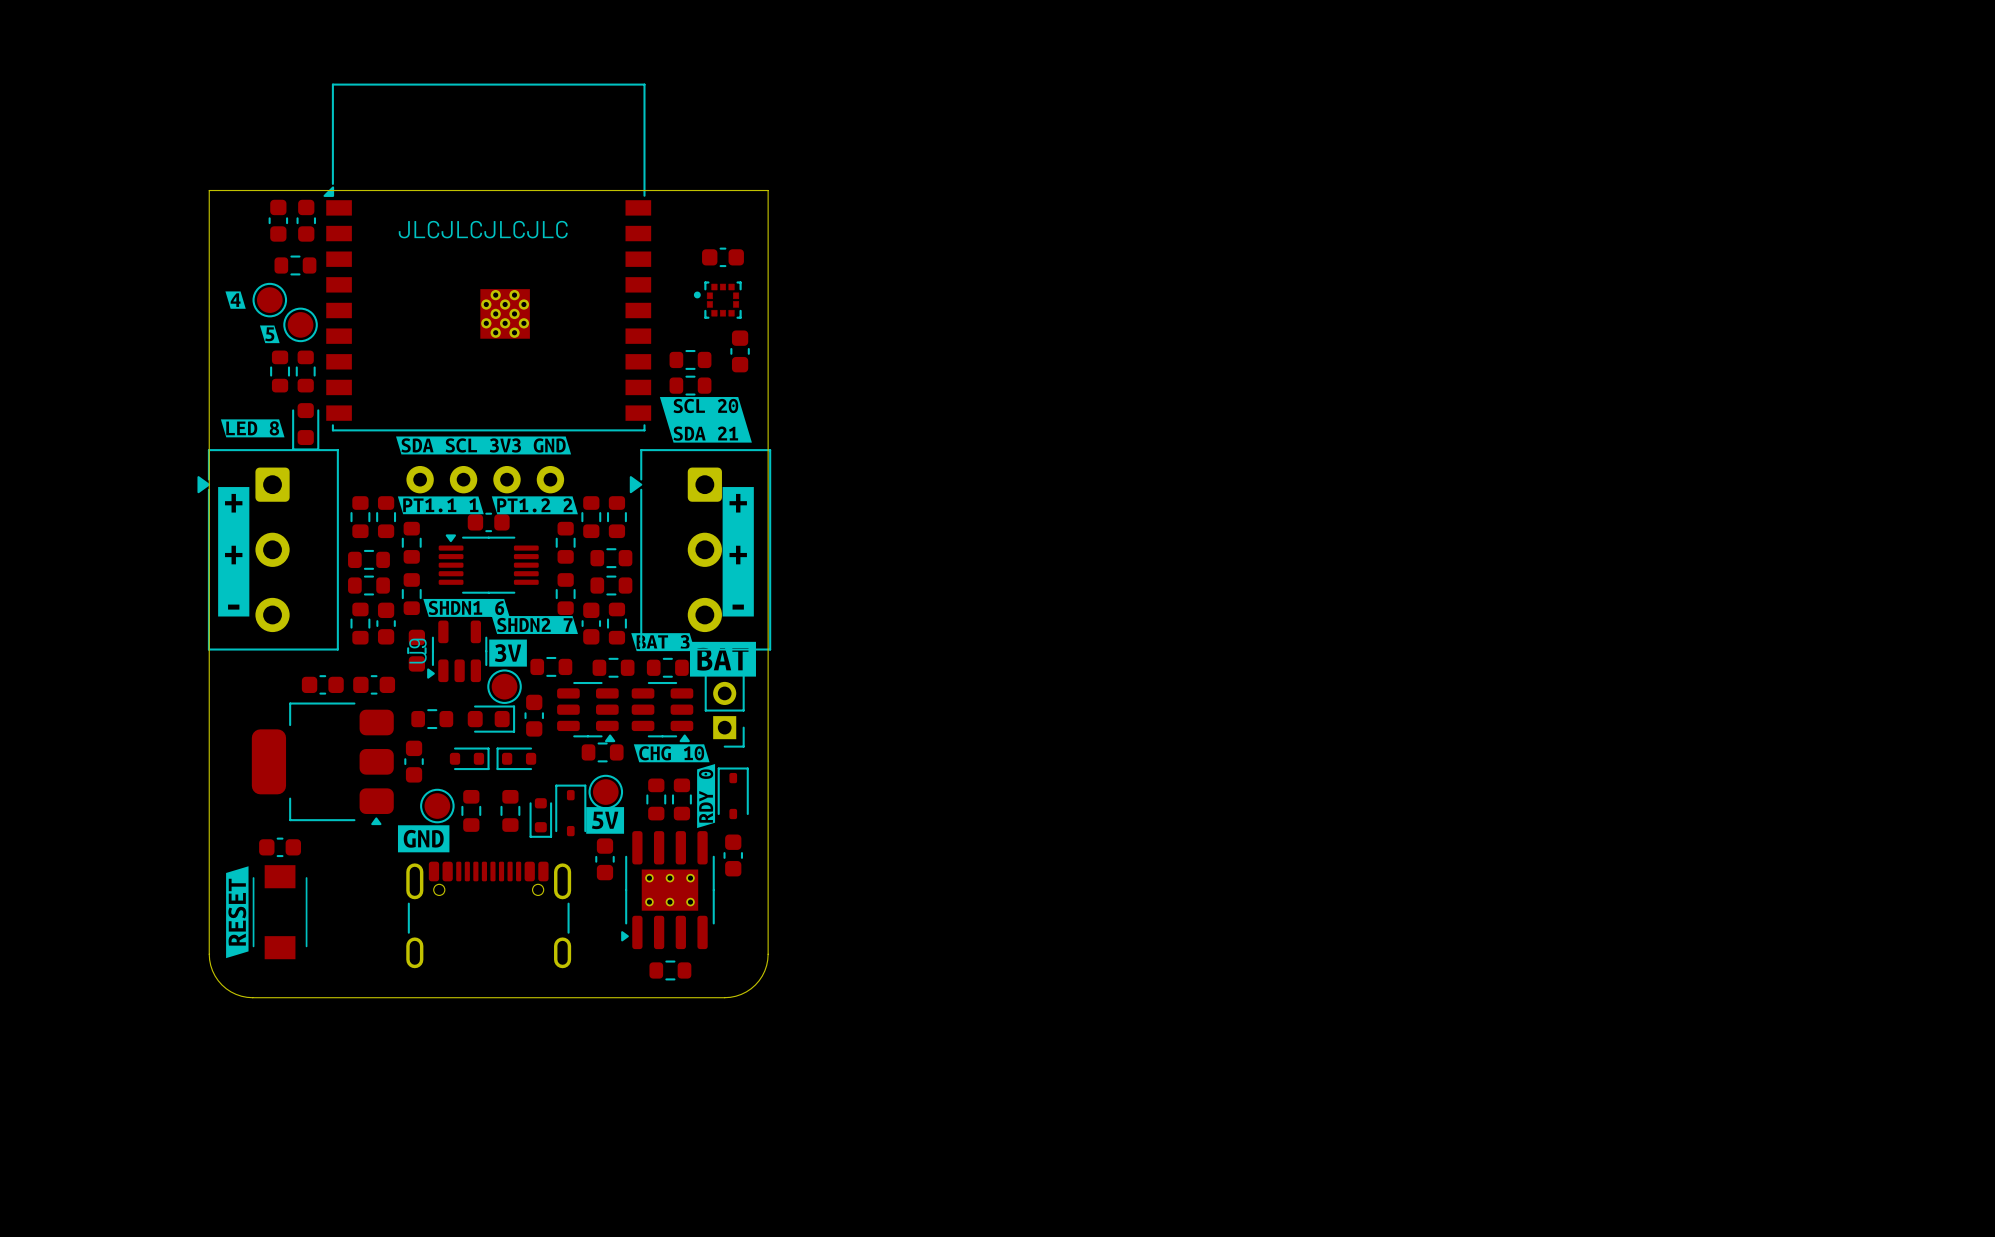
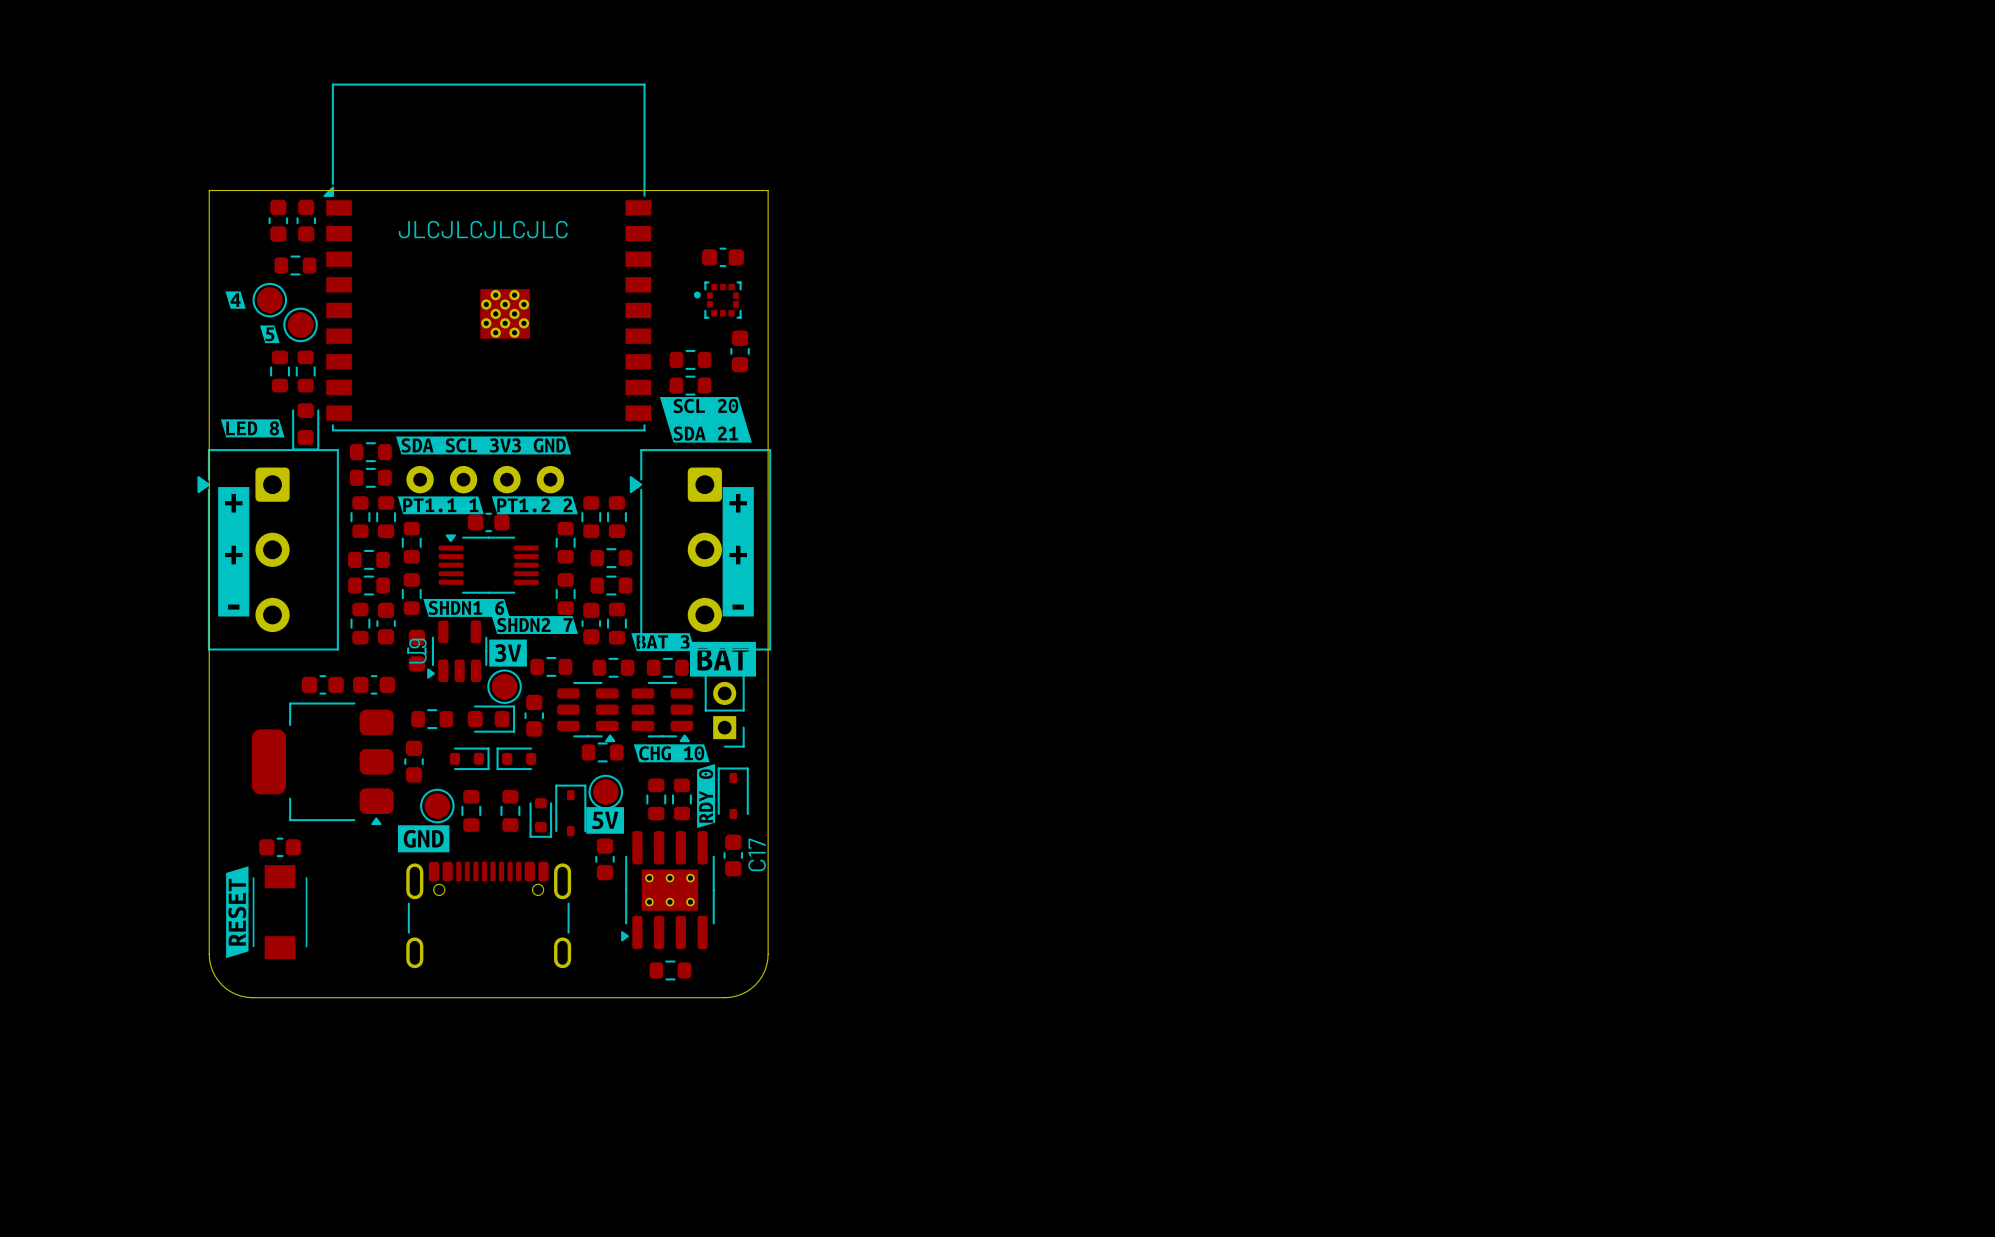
part: none -> (370, 452)
part: none -> (370, 477)
C17 name: none -> C17 (757, 854)

